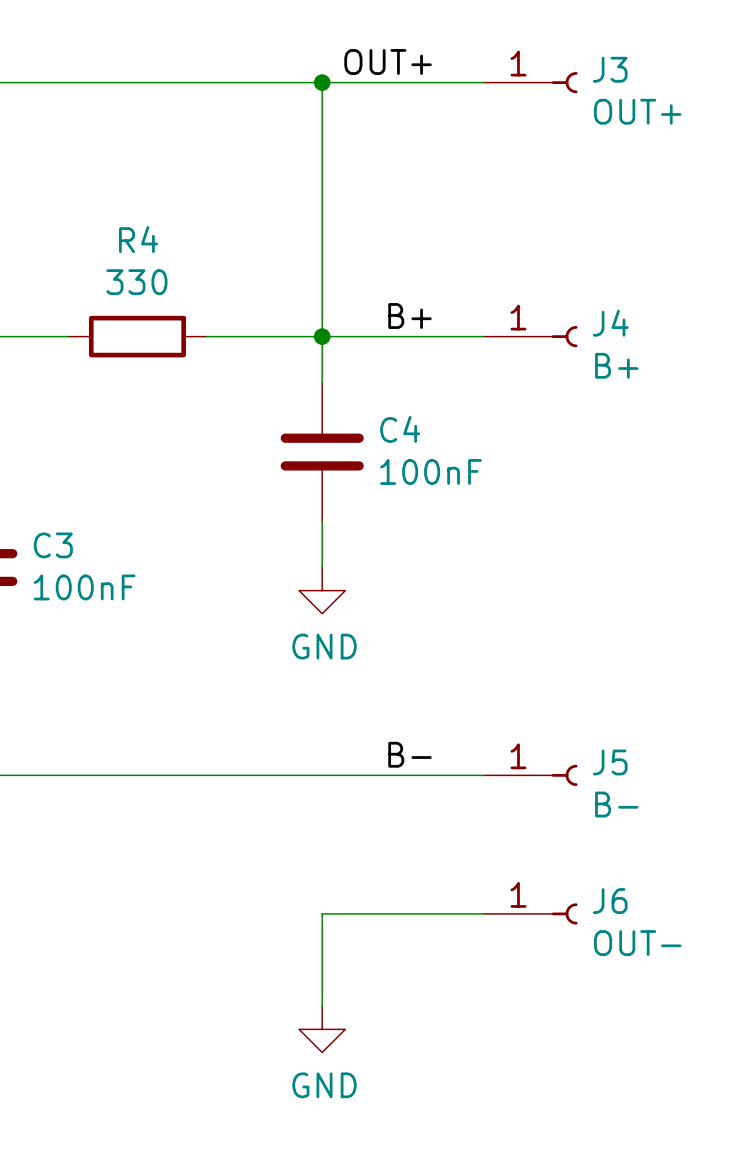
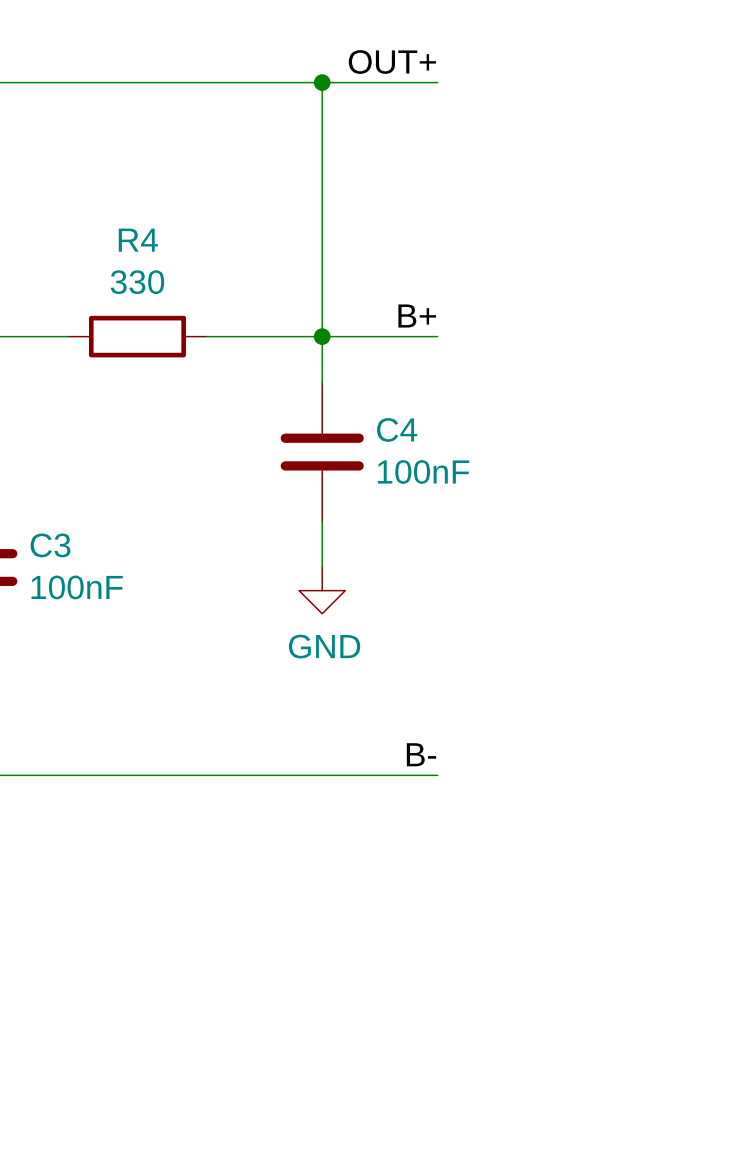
wire: (437, 82) (483, 82) -> none
J3: OUT+ (530, 82) -> none
wire: (437, 336) (483, 336) -> none
J4: B+ (530, 336) -> none
wire: (437, 775) (483, 775) -> none
J5: B- (530, 775) -> none
wire: (483, 913) (322, 913) (322, 1006) -> none
J6: OUT- (530, 913) -> none
power symbol: GND (322, 1029) -> none

